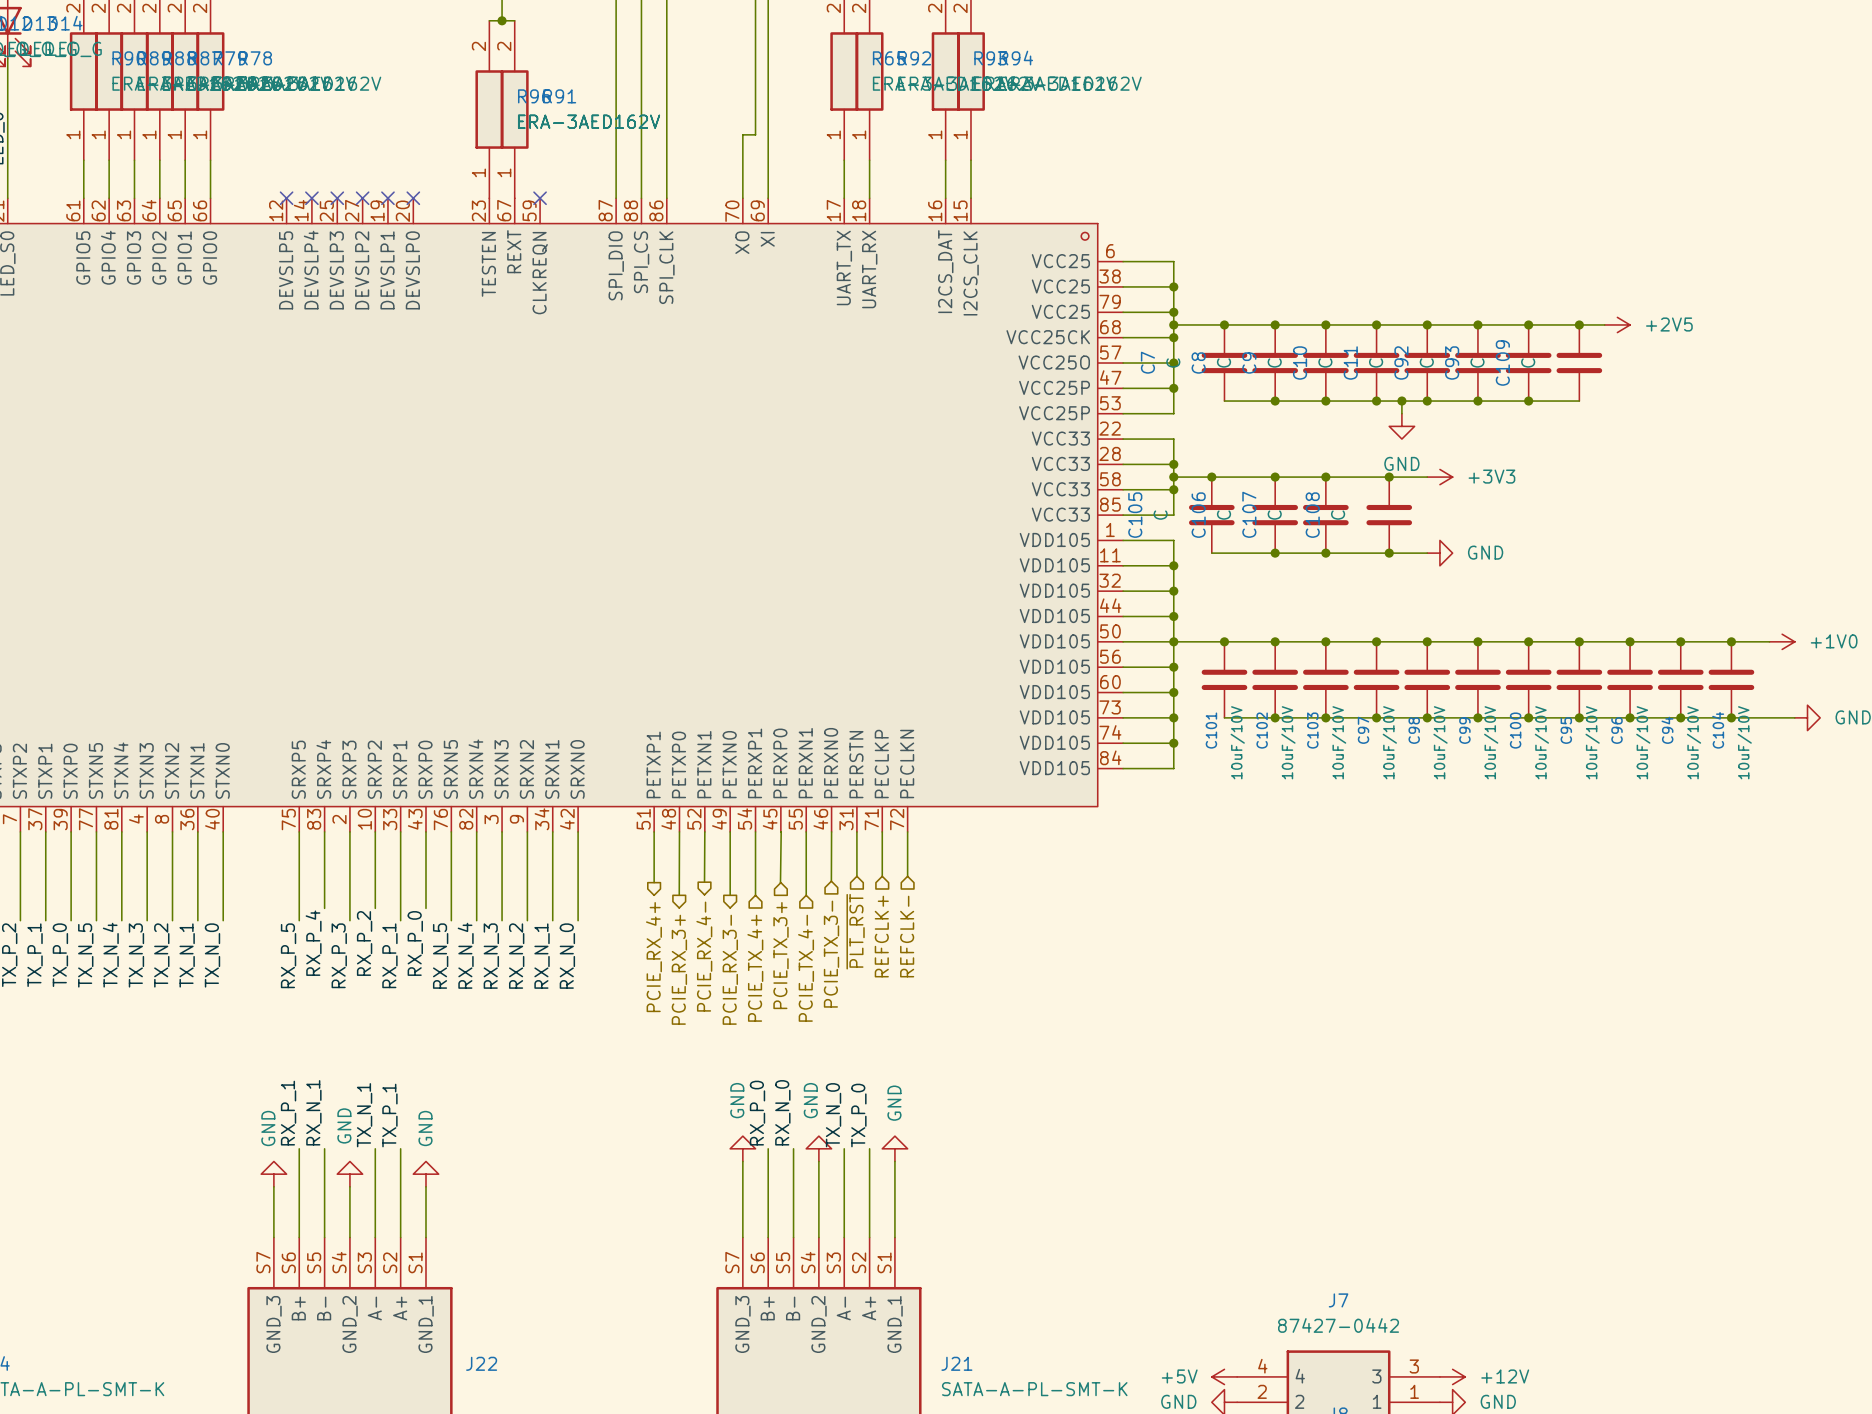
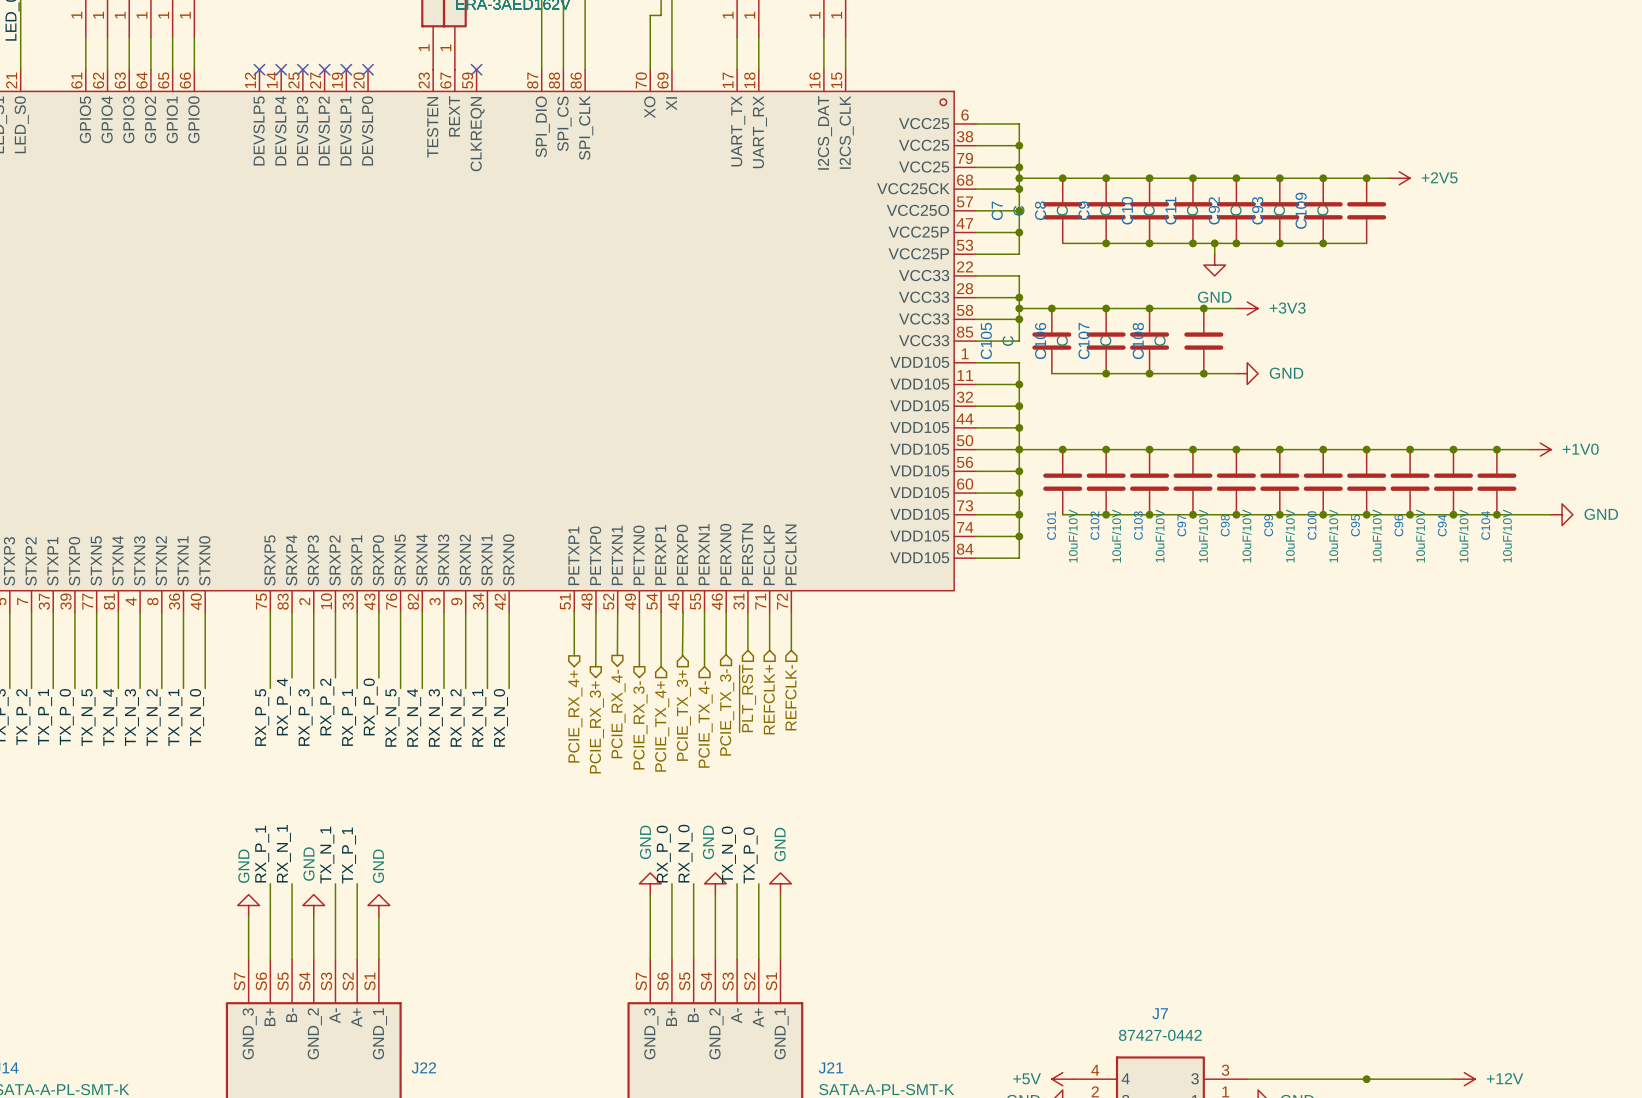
wire: none -> (1247, 1079) (1453, 1079)
power symbol: +12V (1452, 1376) -> none
junction: none -> (1366, 1079)
power symbol: none -> +12V (1464, 1079)

